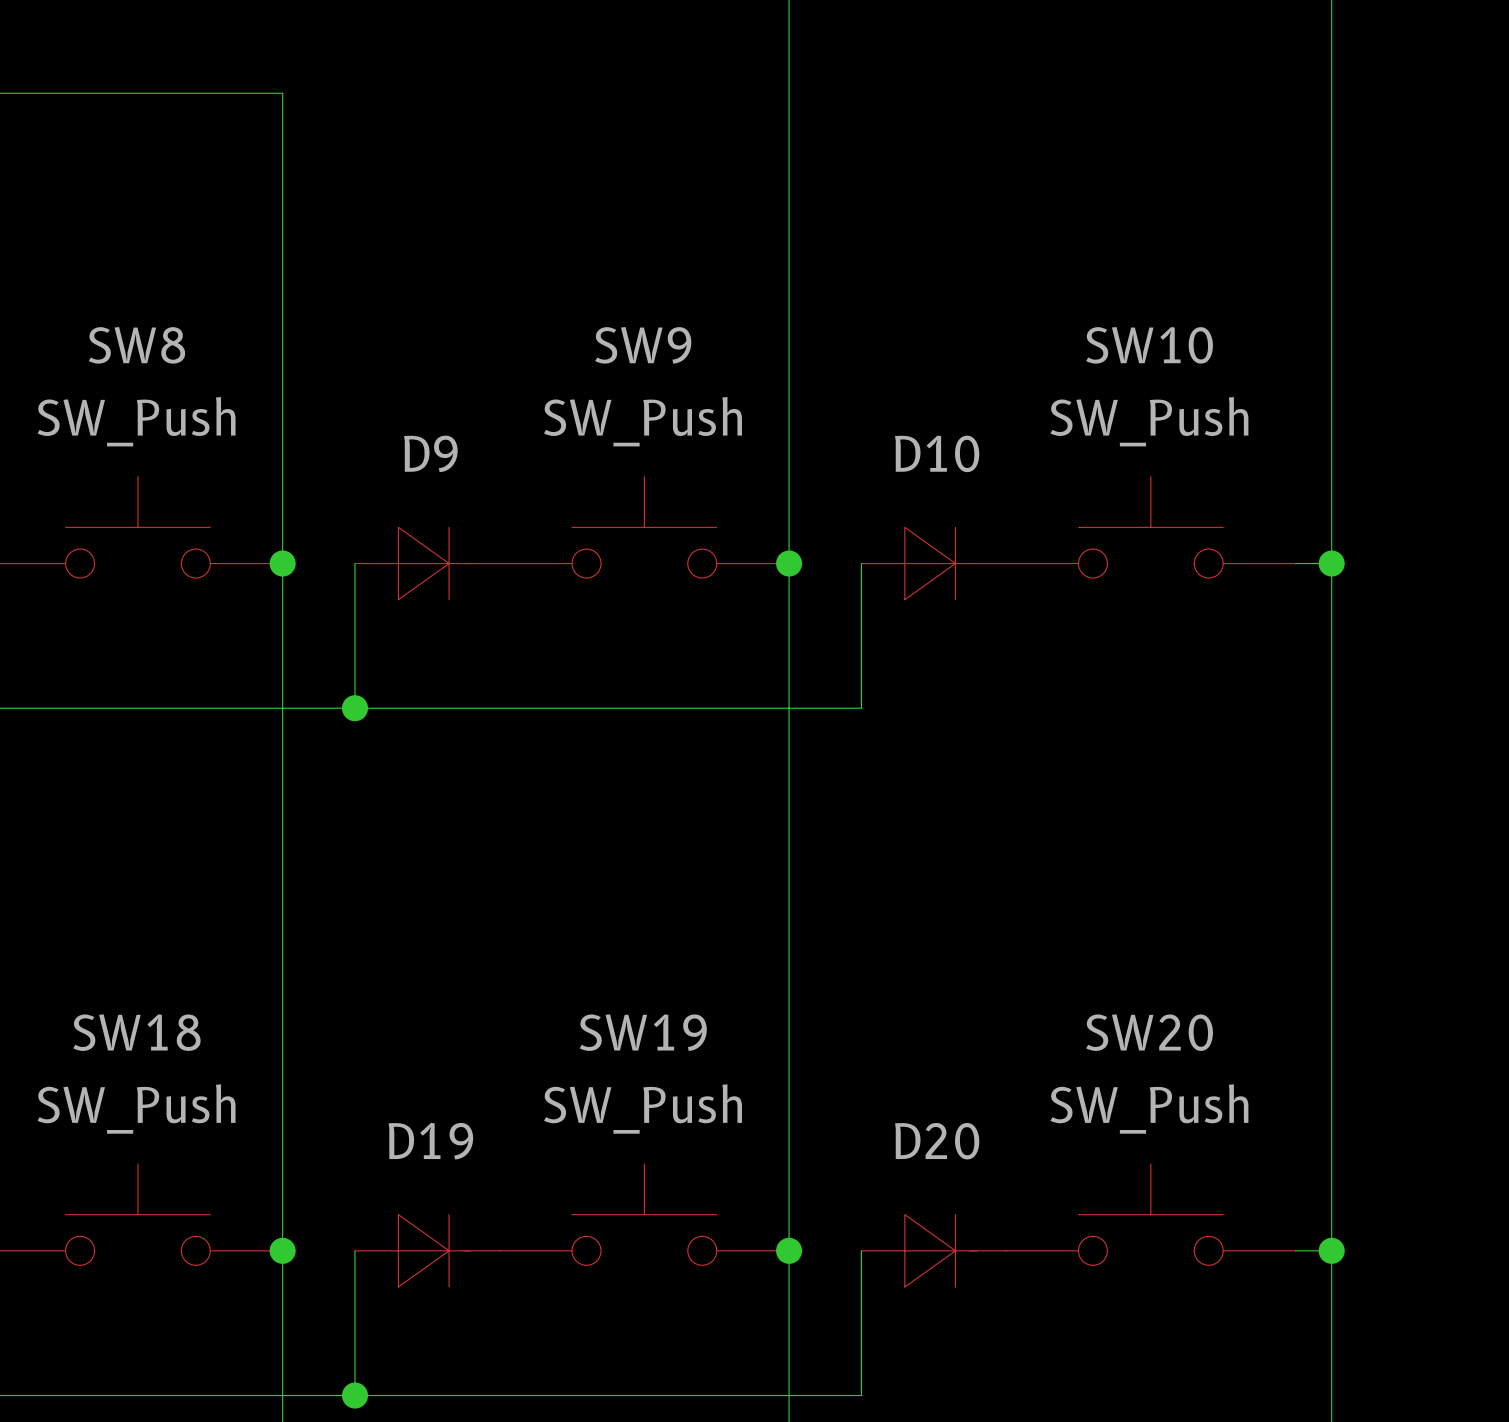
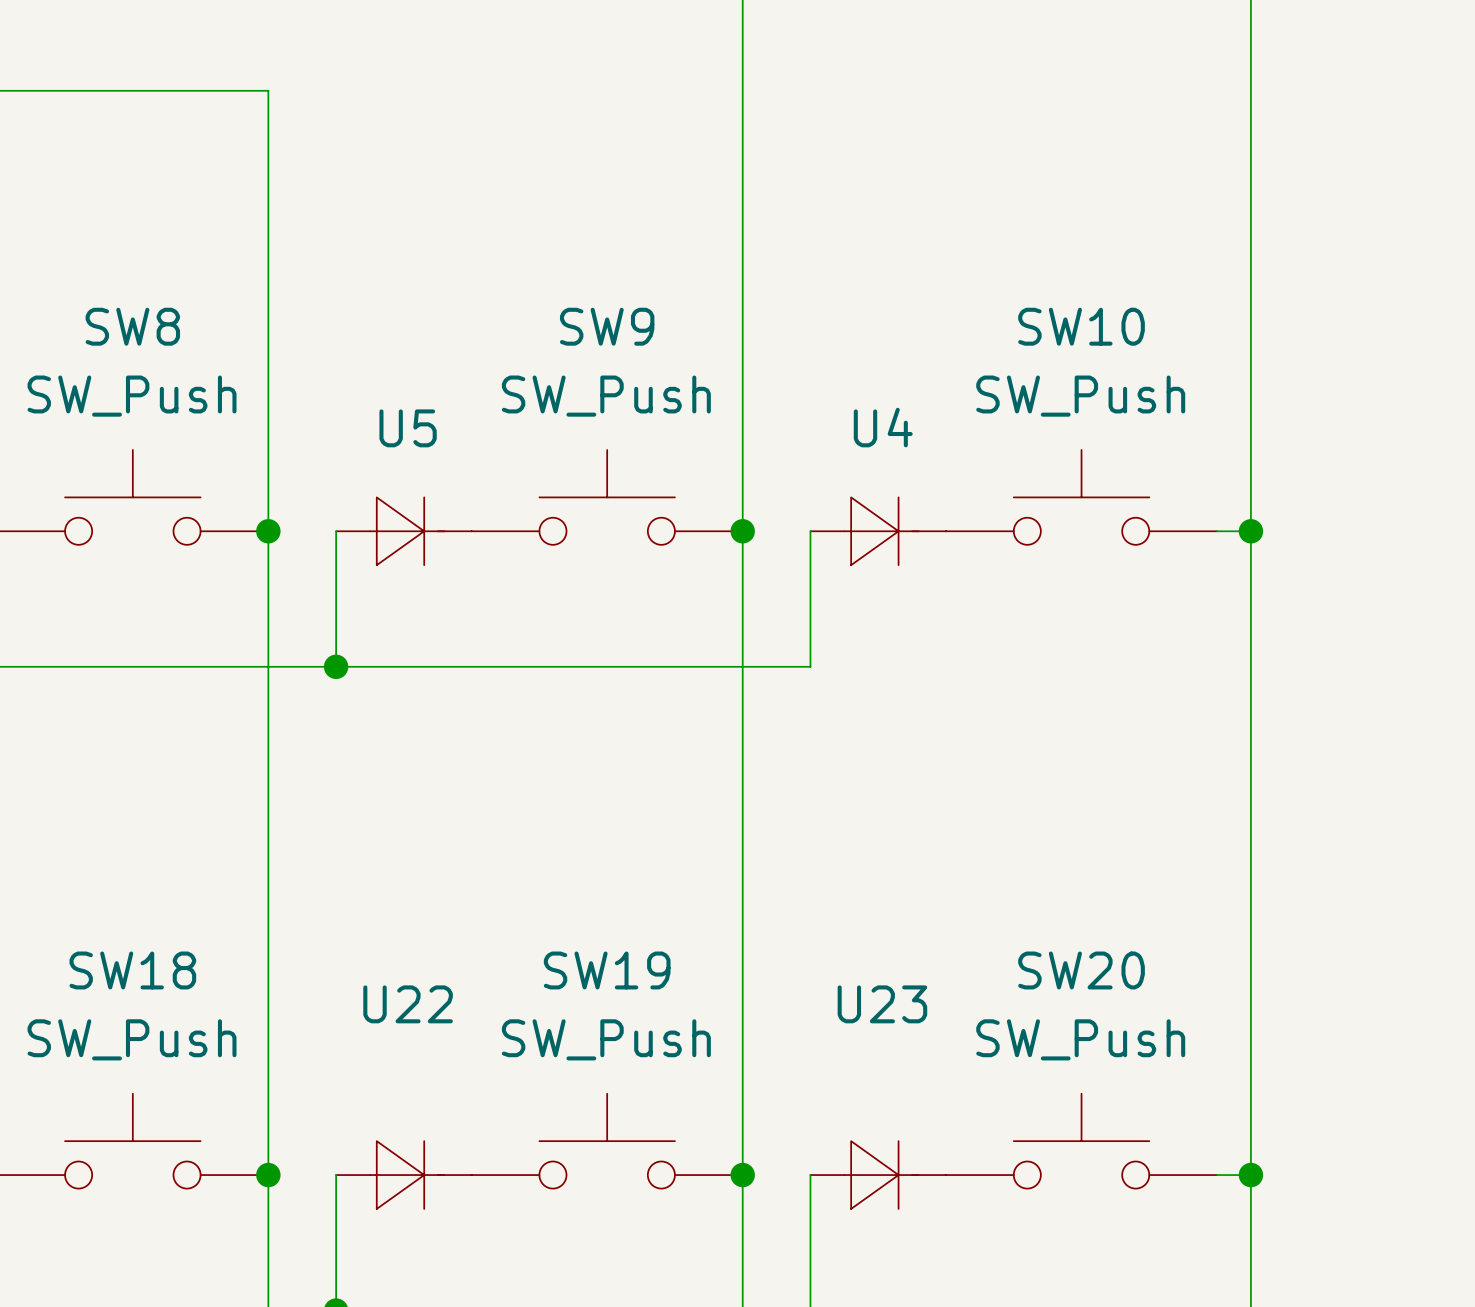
D9 name: D9 (430, 453) -> U5 (408, 428)
D10 name: D10 (937, 453) -> U4 (883, 427)
D19 name: D19 (430, 1141) -> U22 (408, 1004)
D20 name: D20 (937, 1141) -> U23 (882, 1004)

